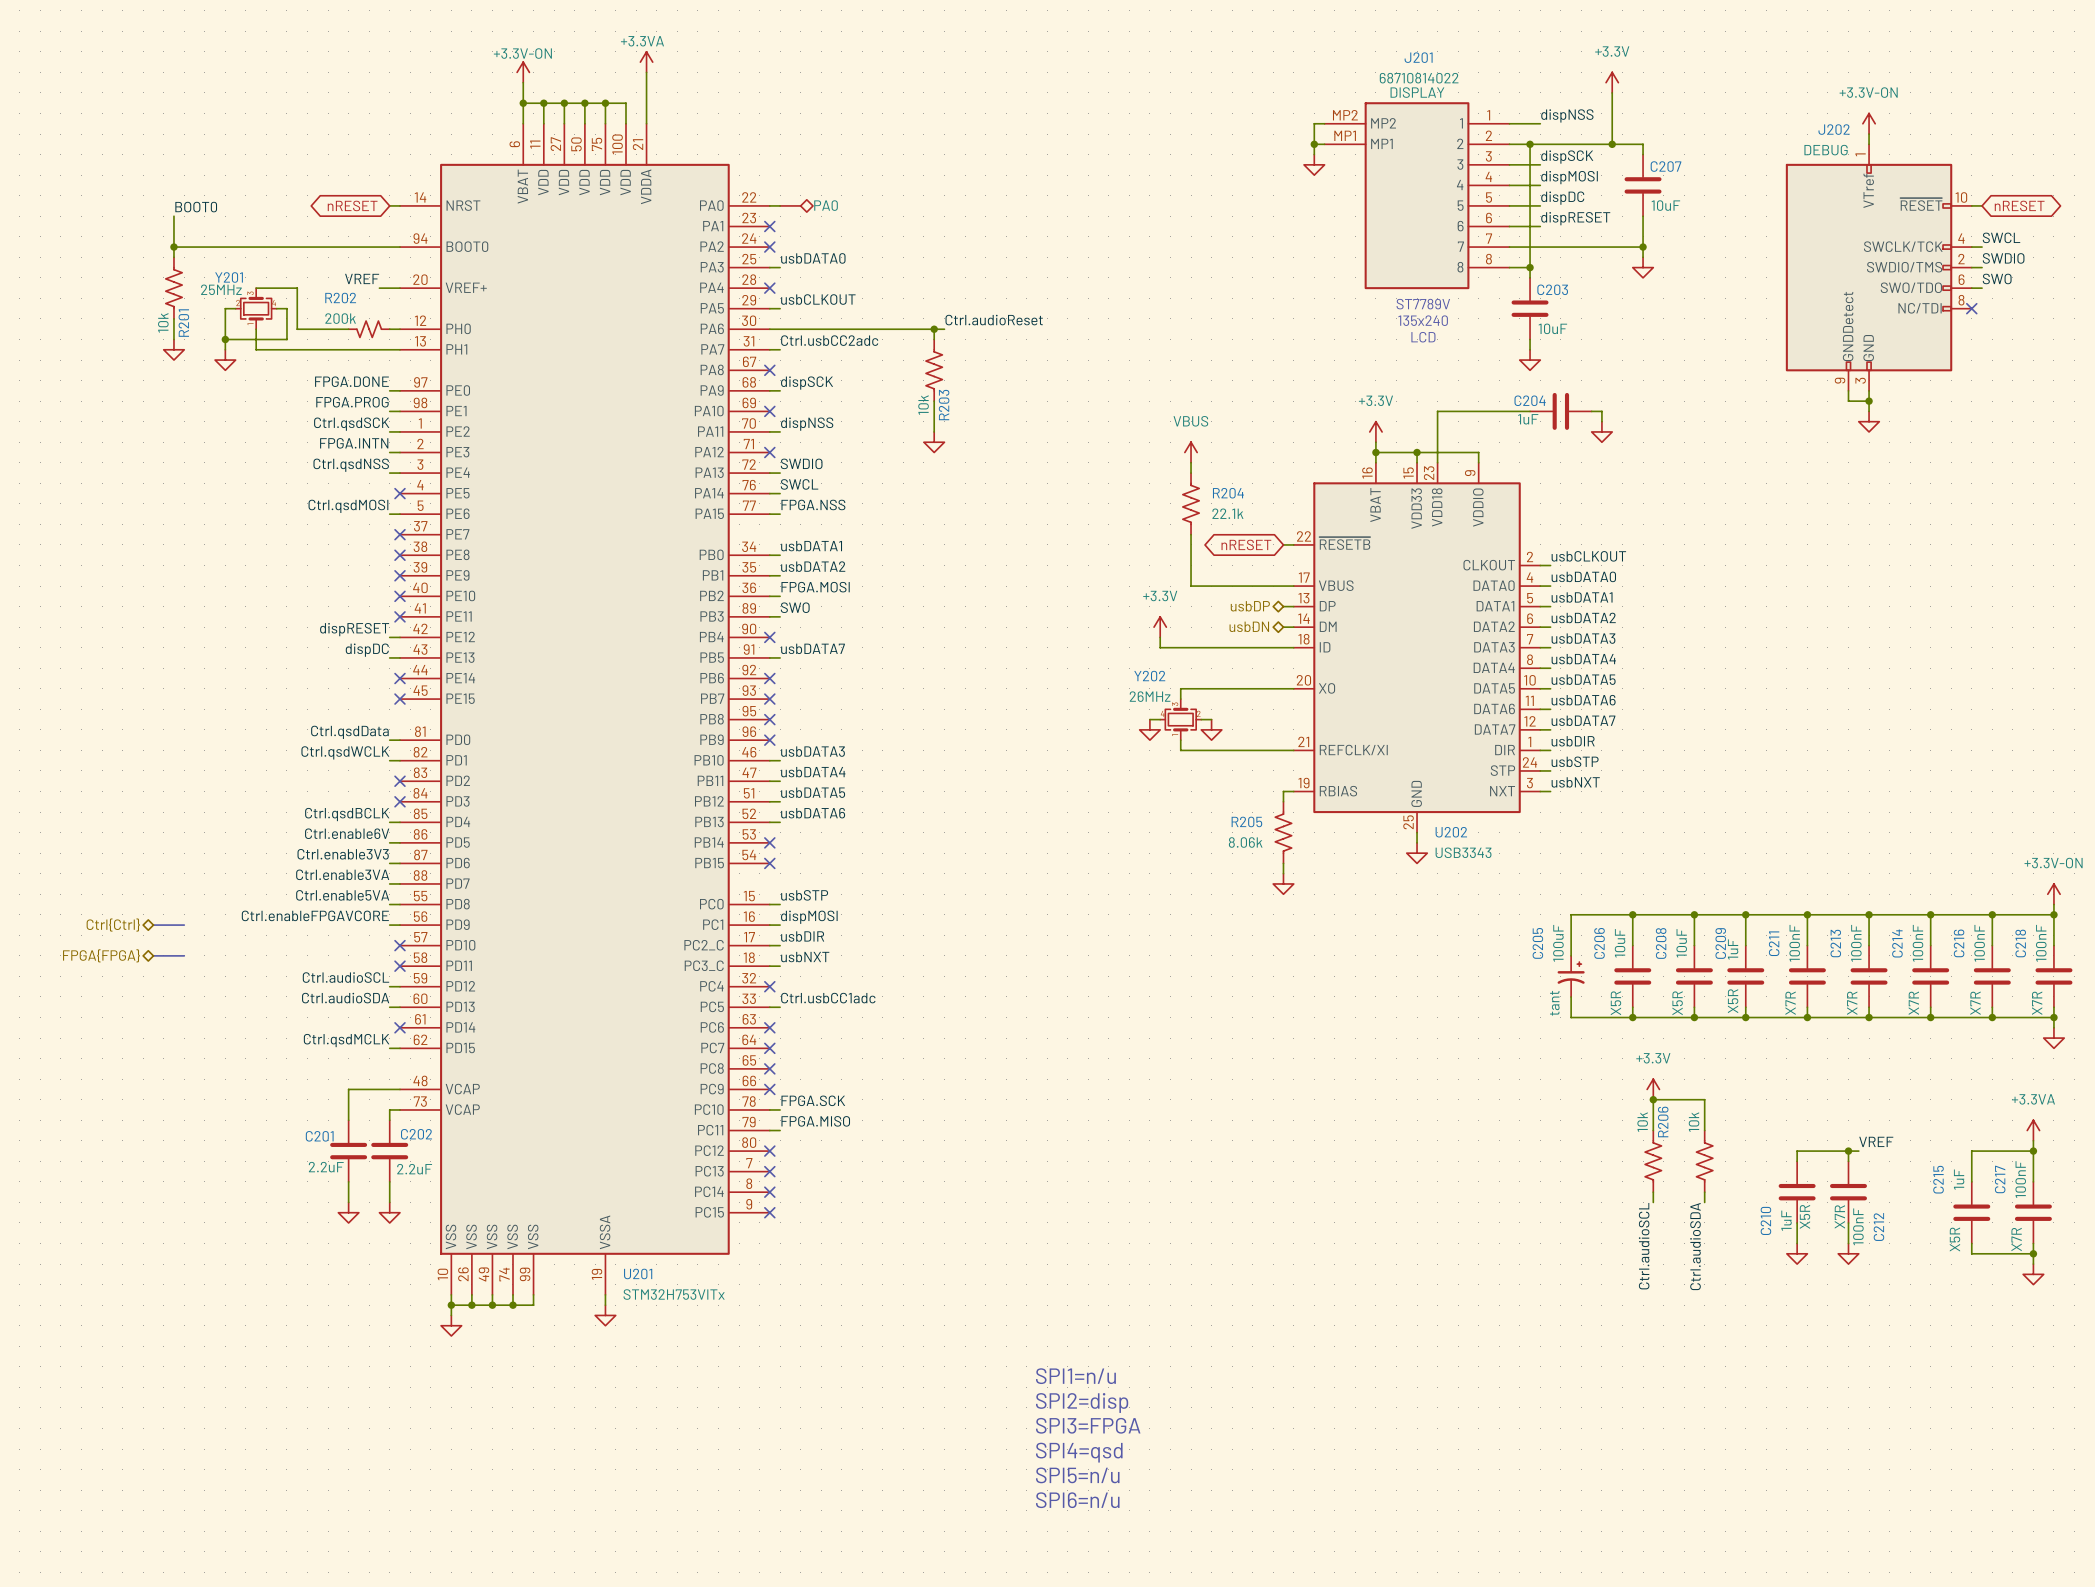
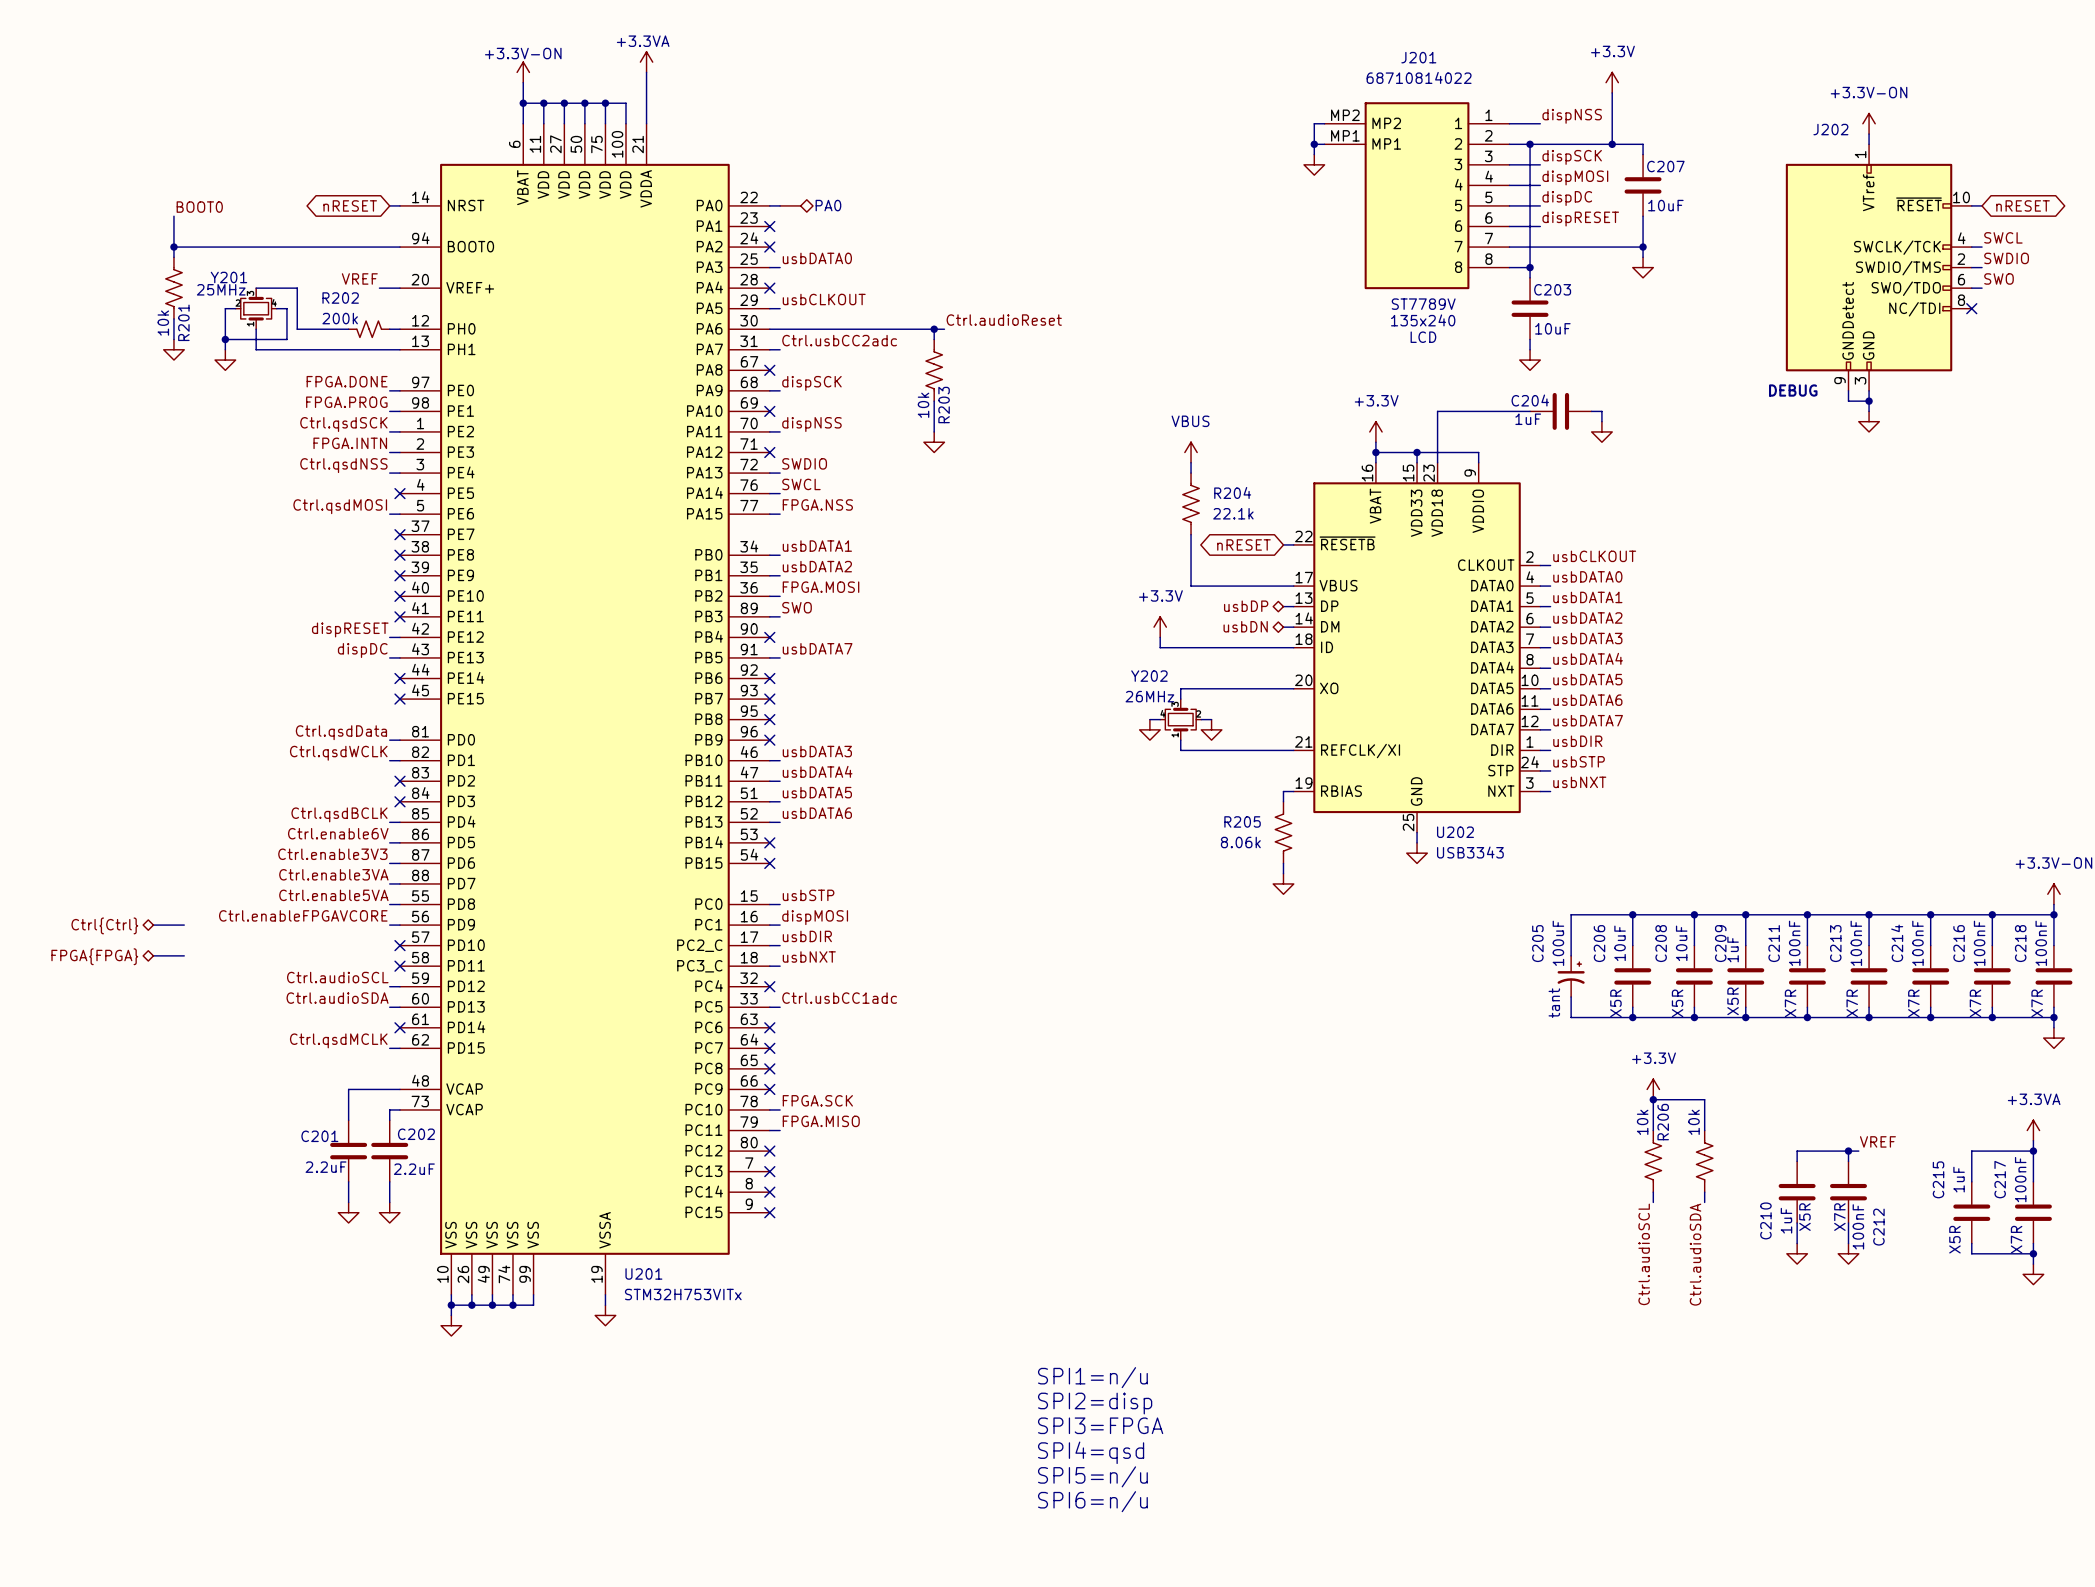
J201 text: DISPLAY (1417, 92) -> none
J202 text: DEBUG (1826, 150) -> none
text: none -> DEBUG (1793, 390)

